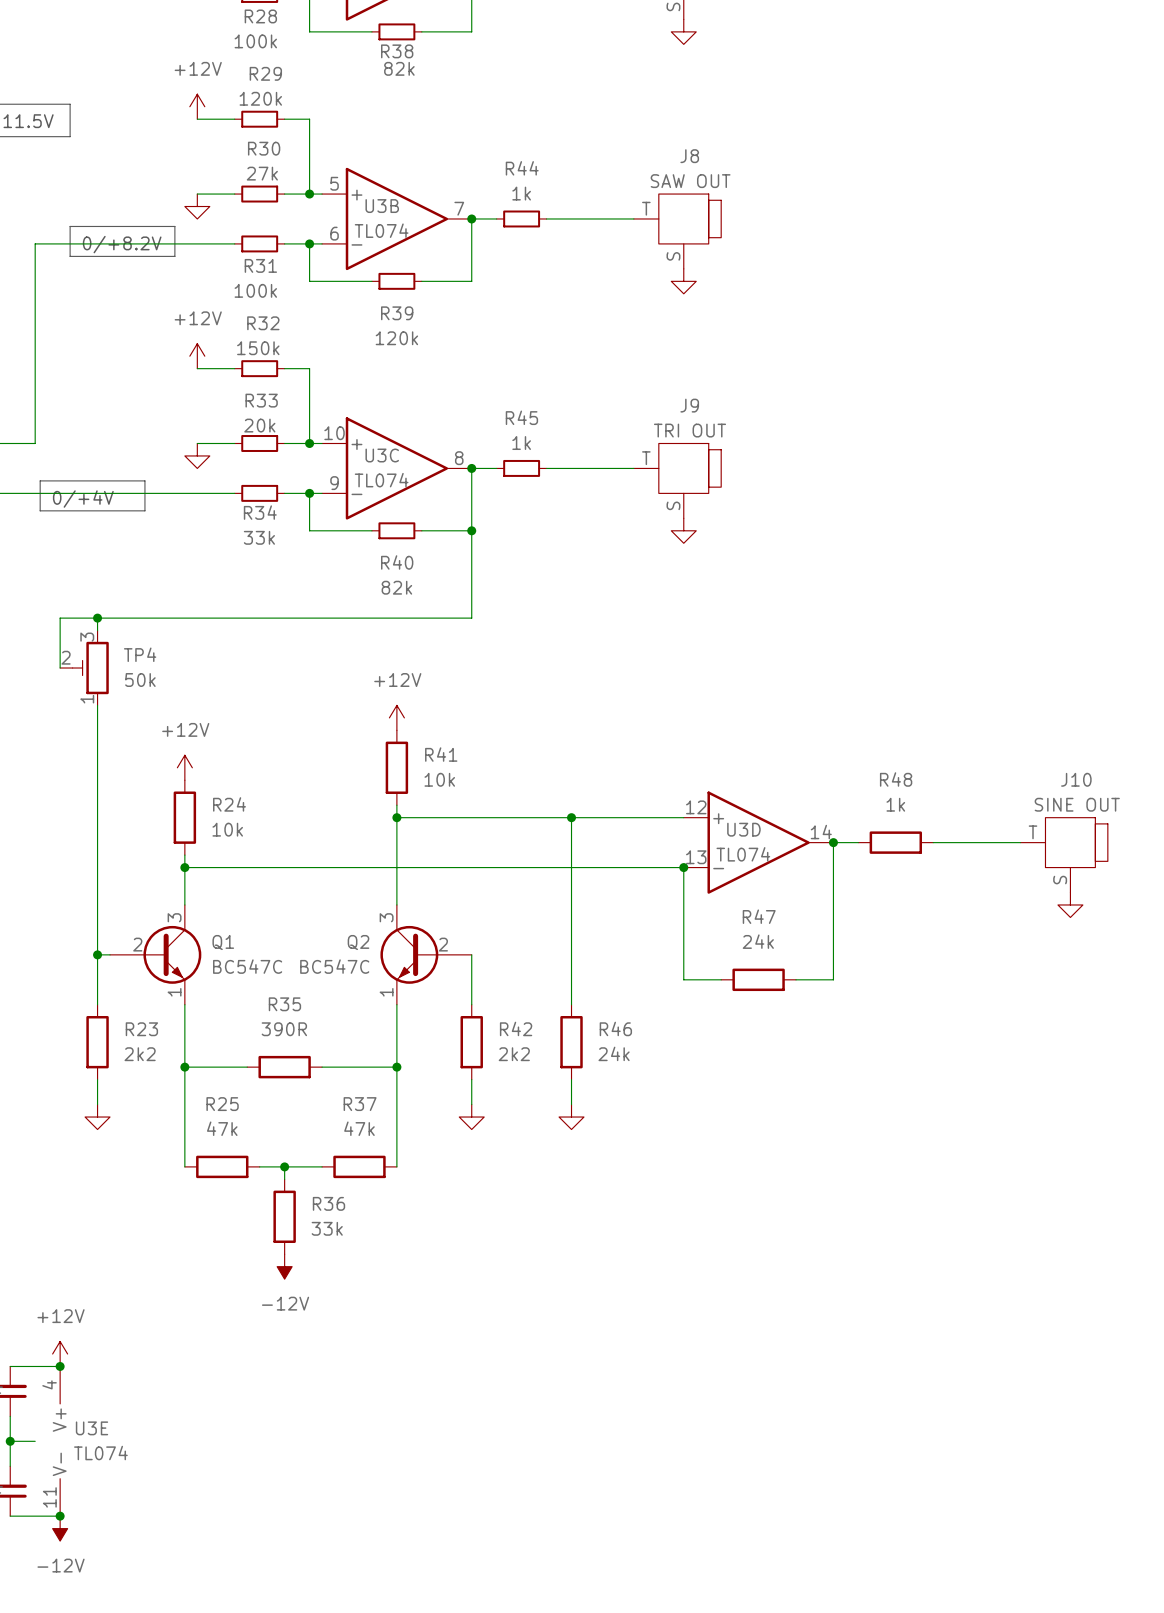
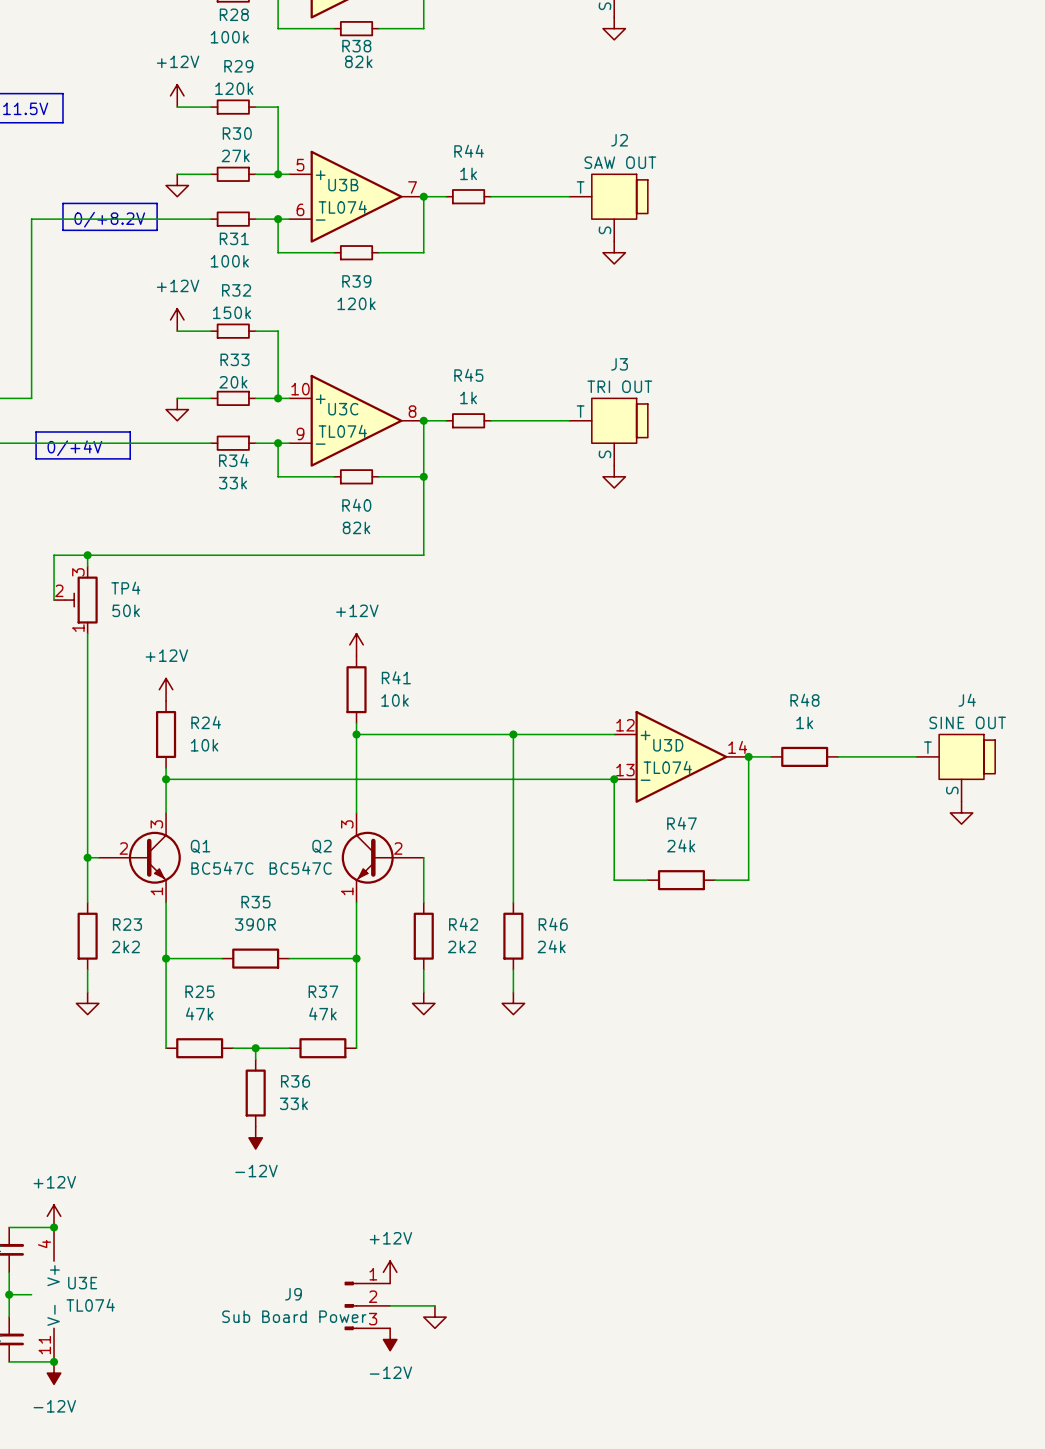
J8 name: J8 (689, 156) -> J2 (619, 140)
J9 name: J9 (689, 405) -> J3 (619, 364)
J10 name: J10 (1076, 779) -> J4 (967, 700)
power symbol: none -> +12V (390, 1272)
J9: none -> Sub Board Power (367, 1305)
wire: none -> (390, 1305) (434, 1305)
power symbol: none -> (434, 1317)
power symbol: none -> -12V (390, 1339)

